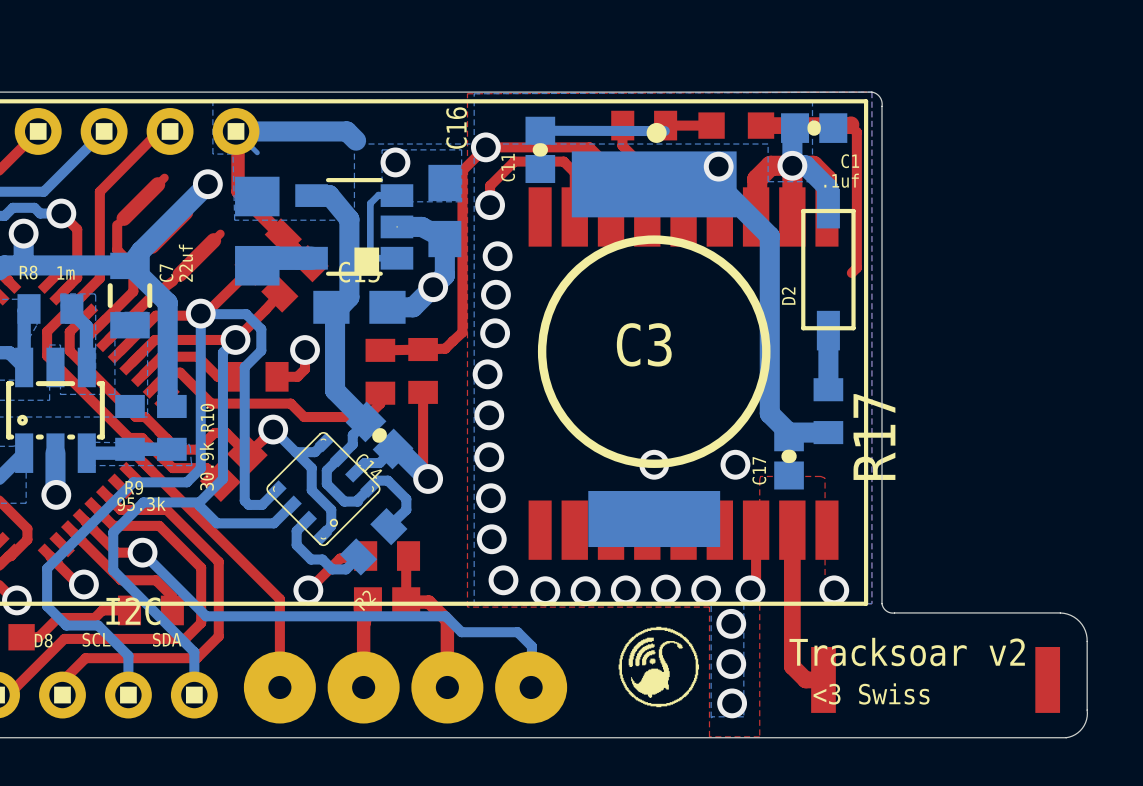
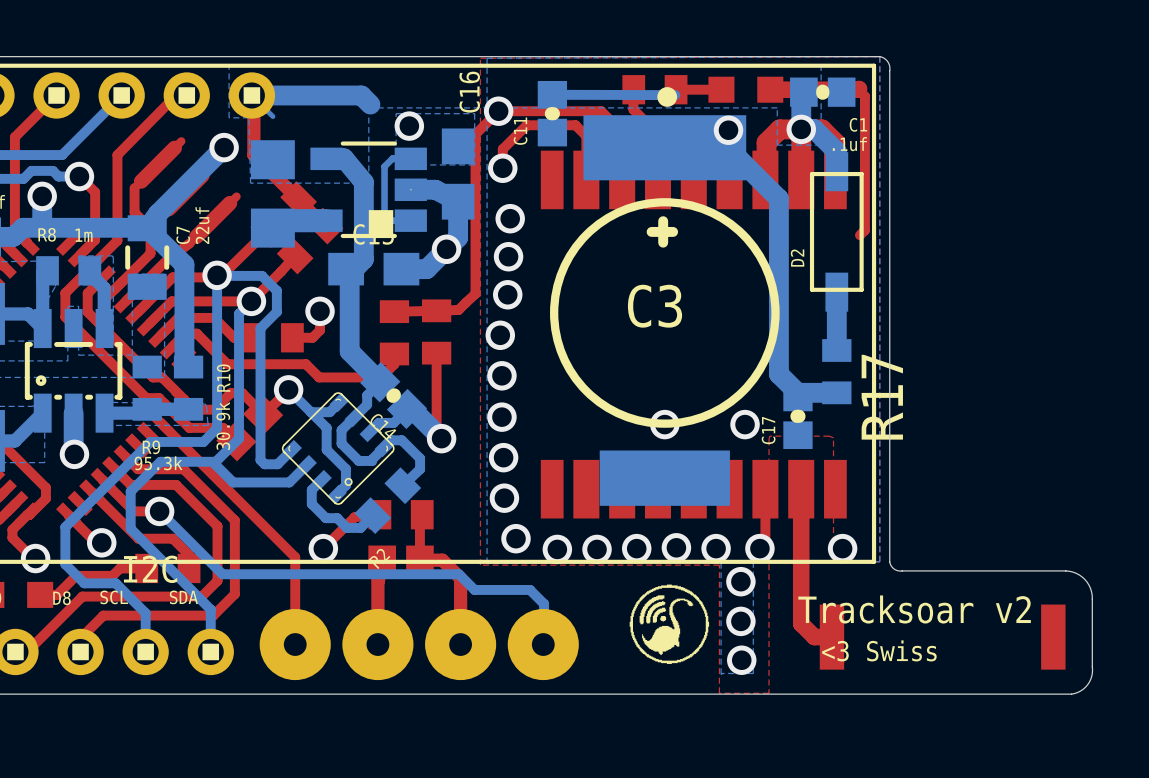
line: none -> (663, 221) (663, 242)
line: none -> (673, 231) (651, 231)

